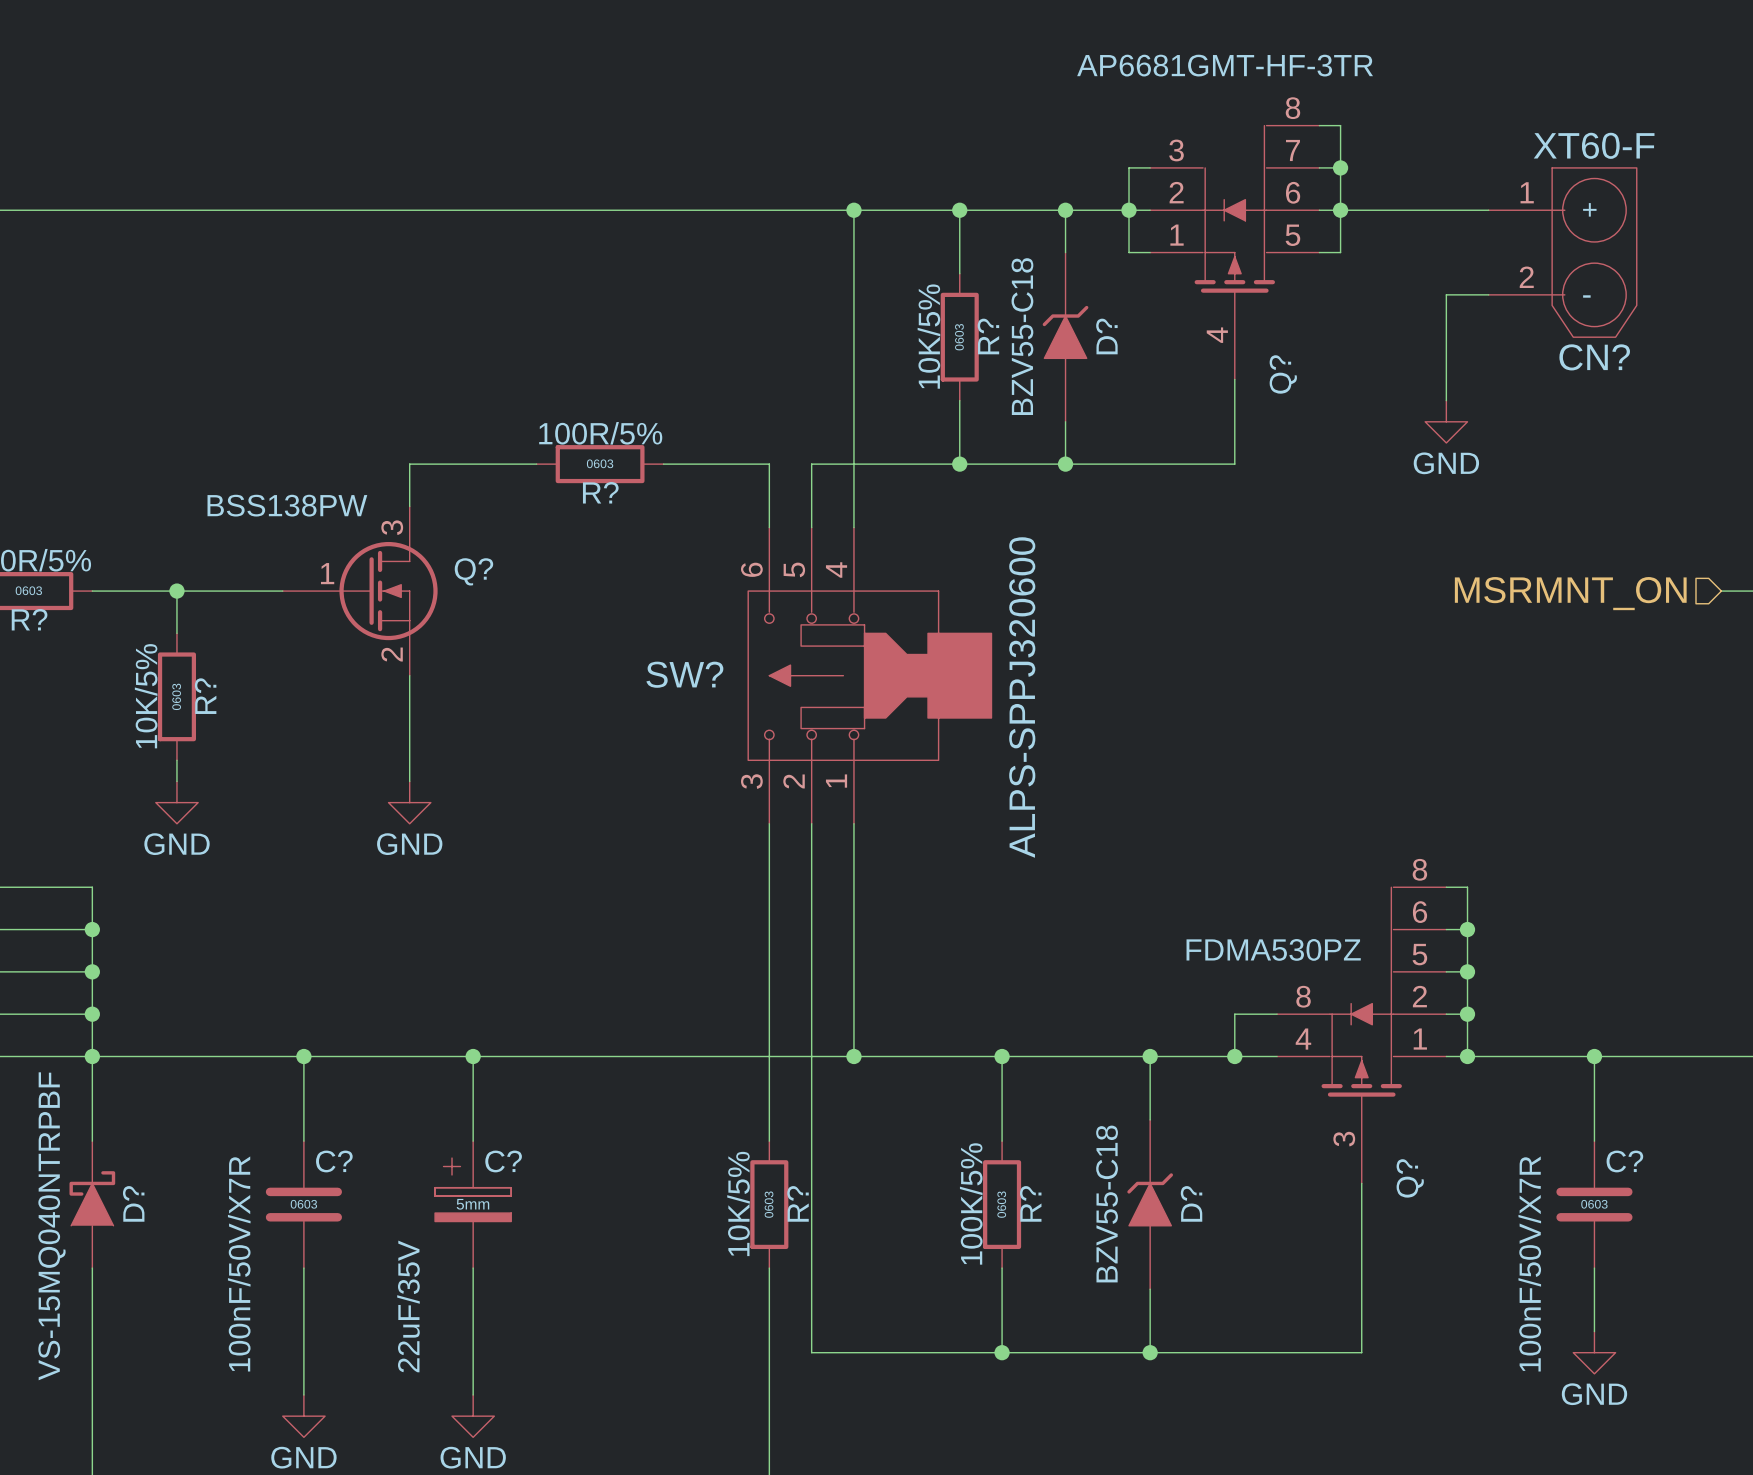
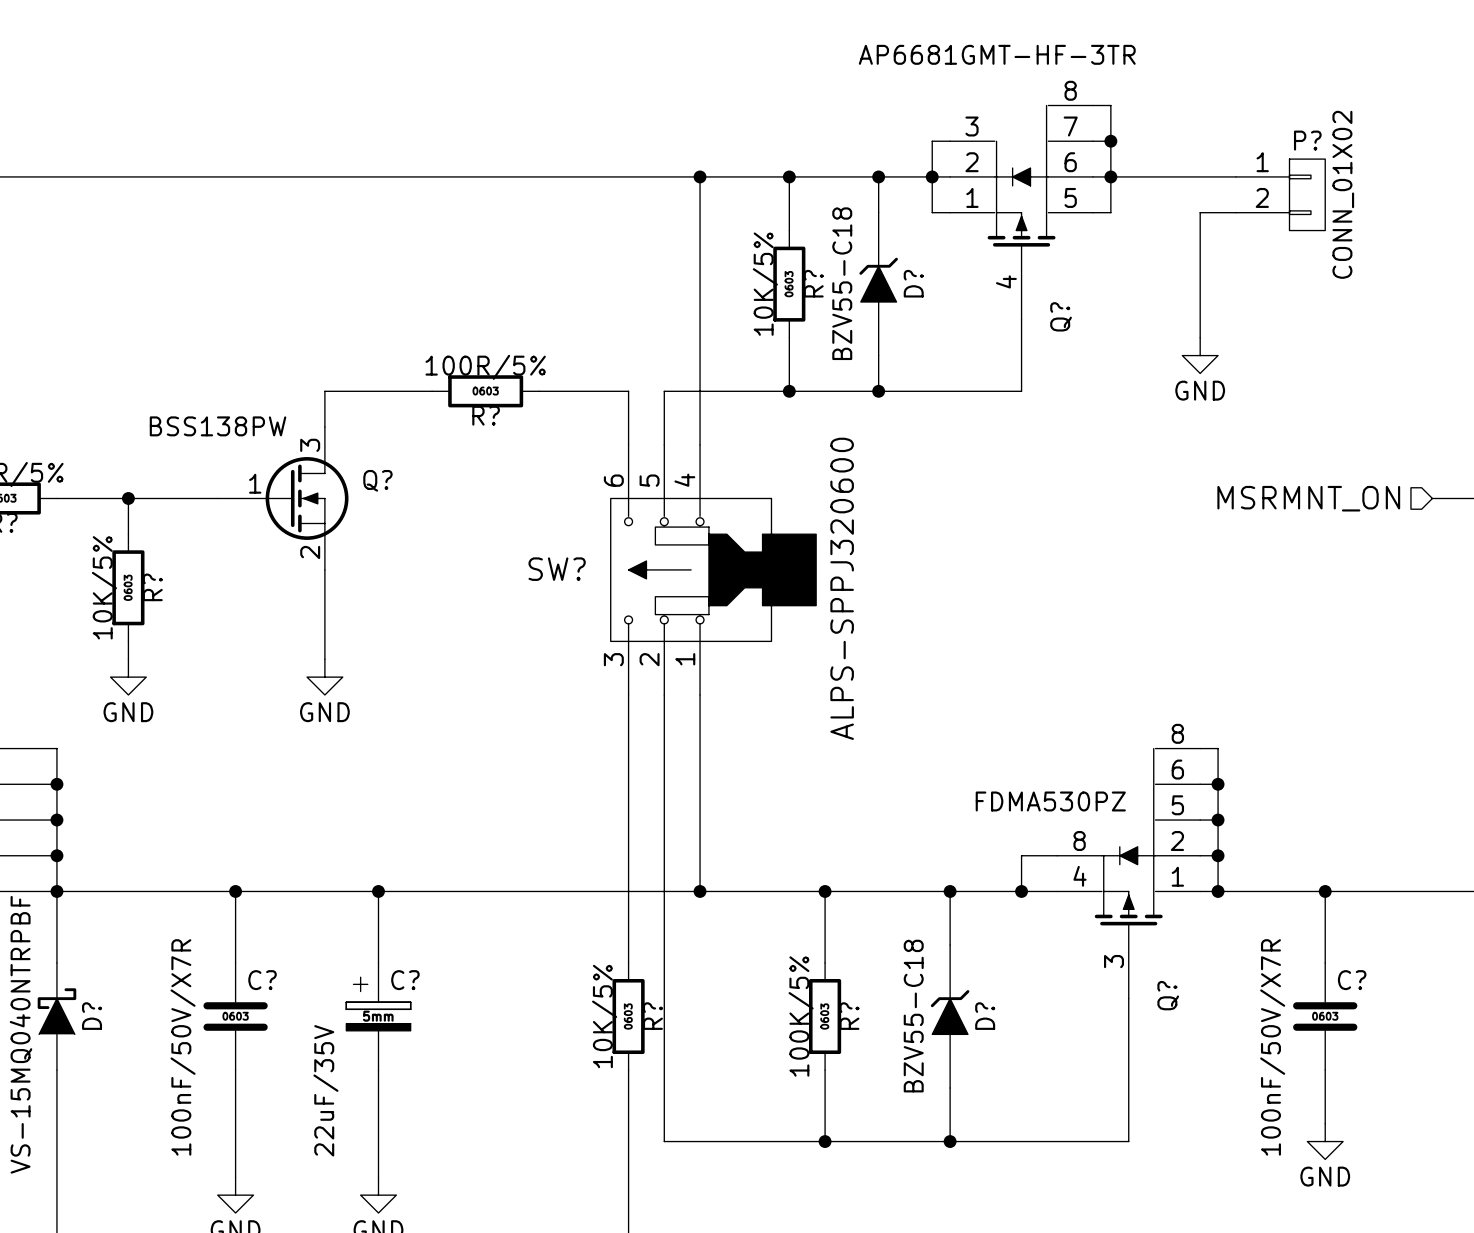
P?: none -> CONN_01X02 (1280, 194)
CN?: XT60-F (1562, 252) -> none
wire: (1446, 294) (1488, 294) -> (1200, 248) (1200, 212) (1235, 212)

